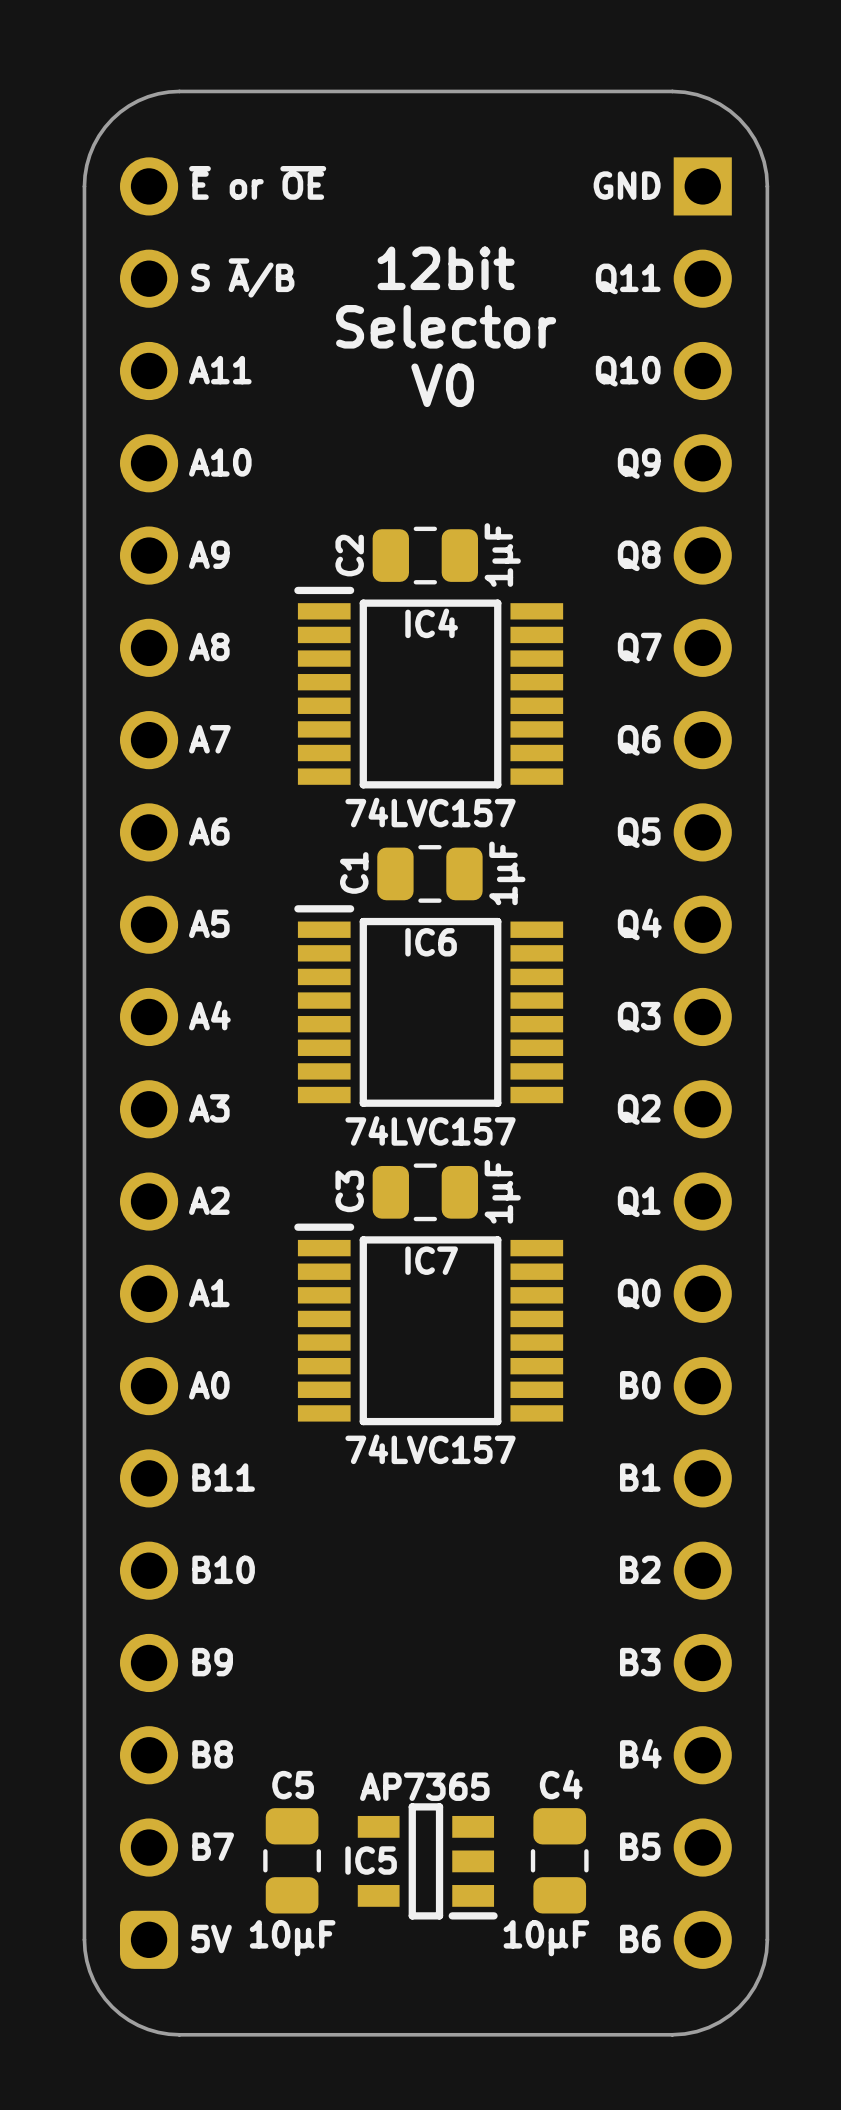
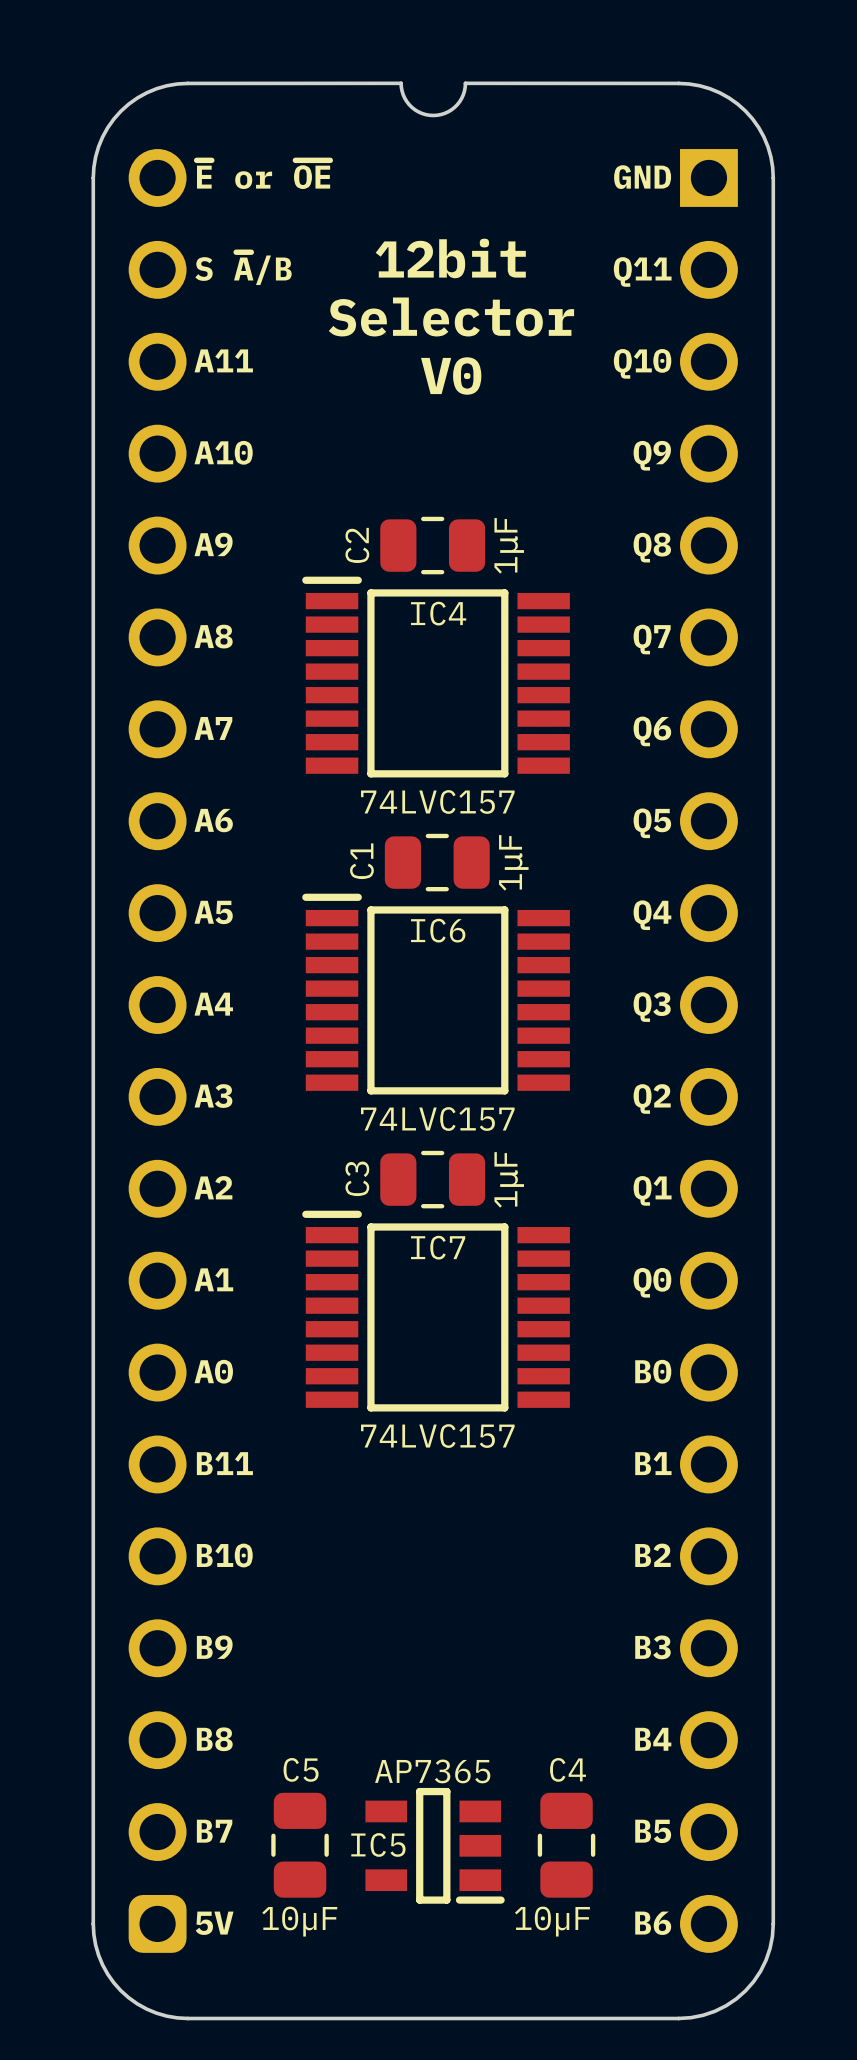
part footprint: [82, 89, 770, 2037] -> [91, 81, 776, 2021]

